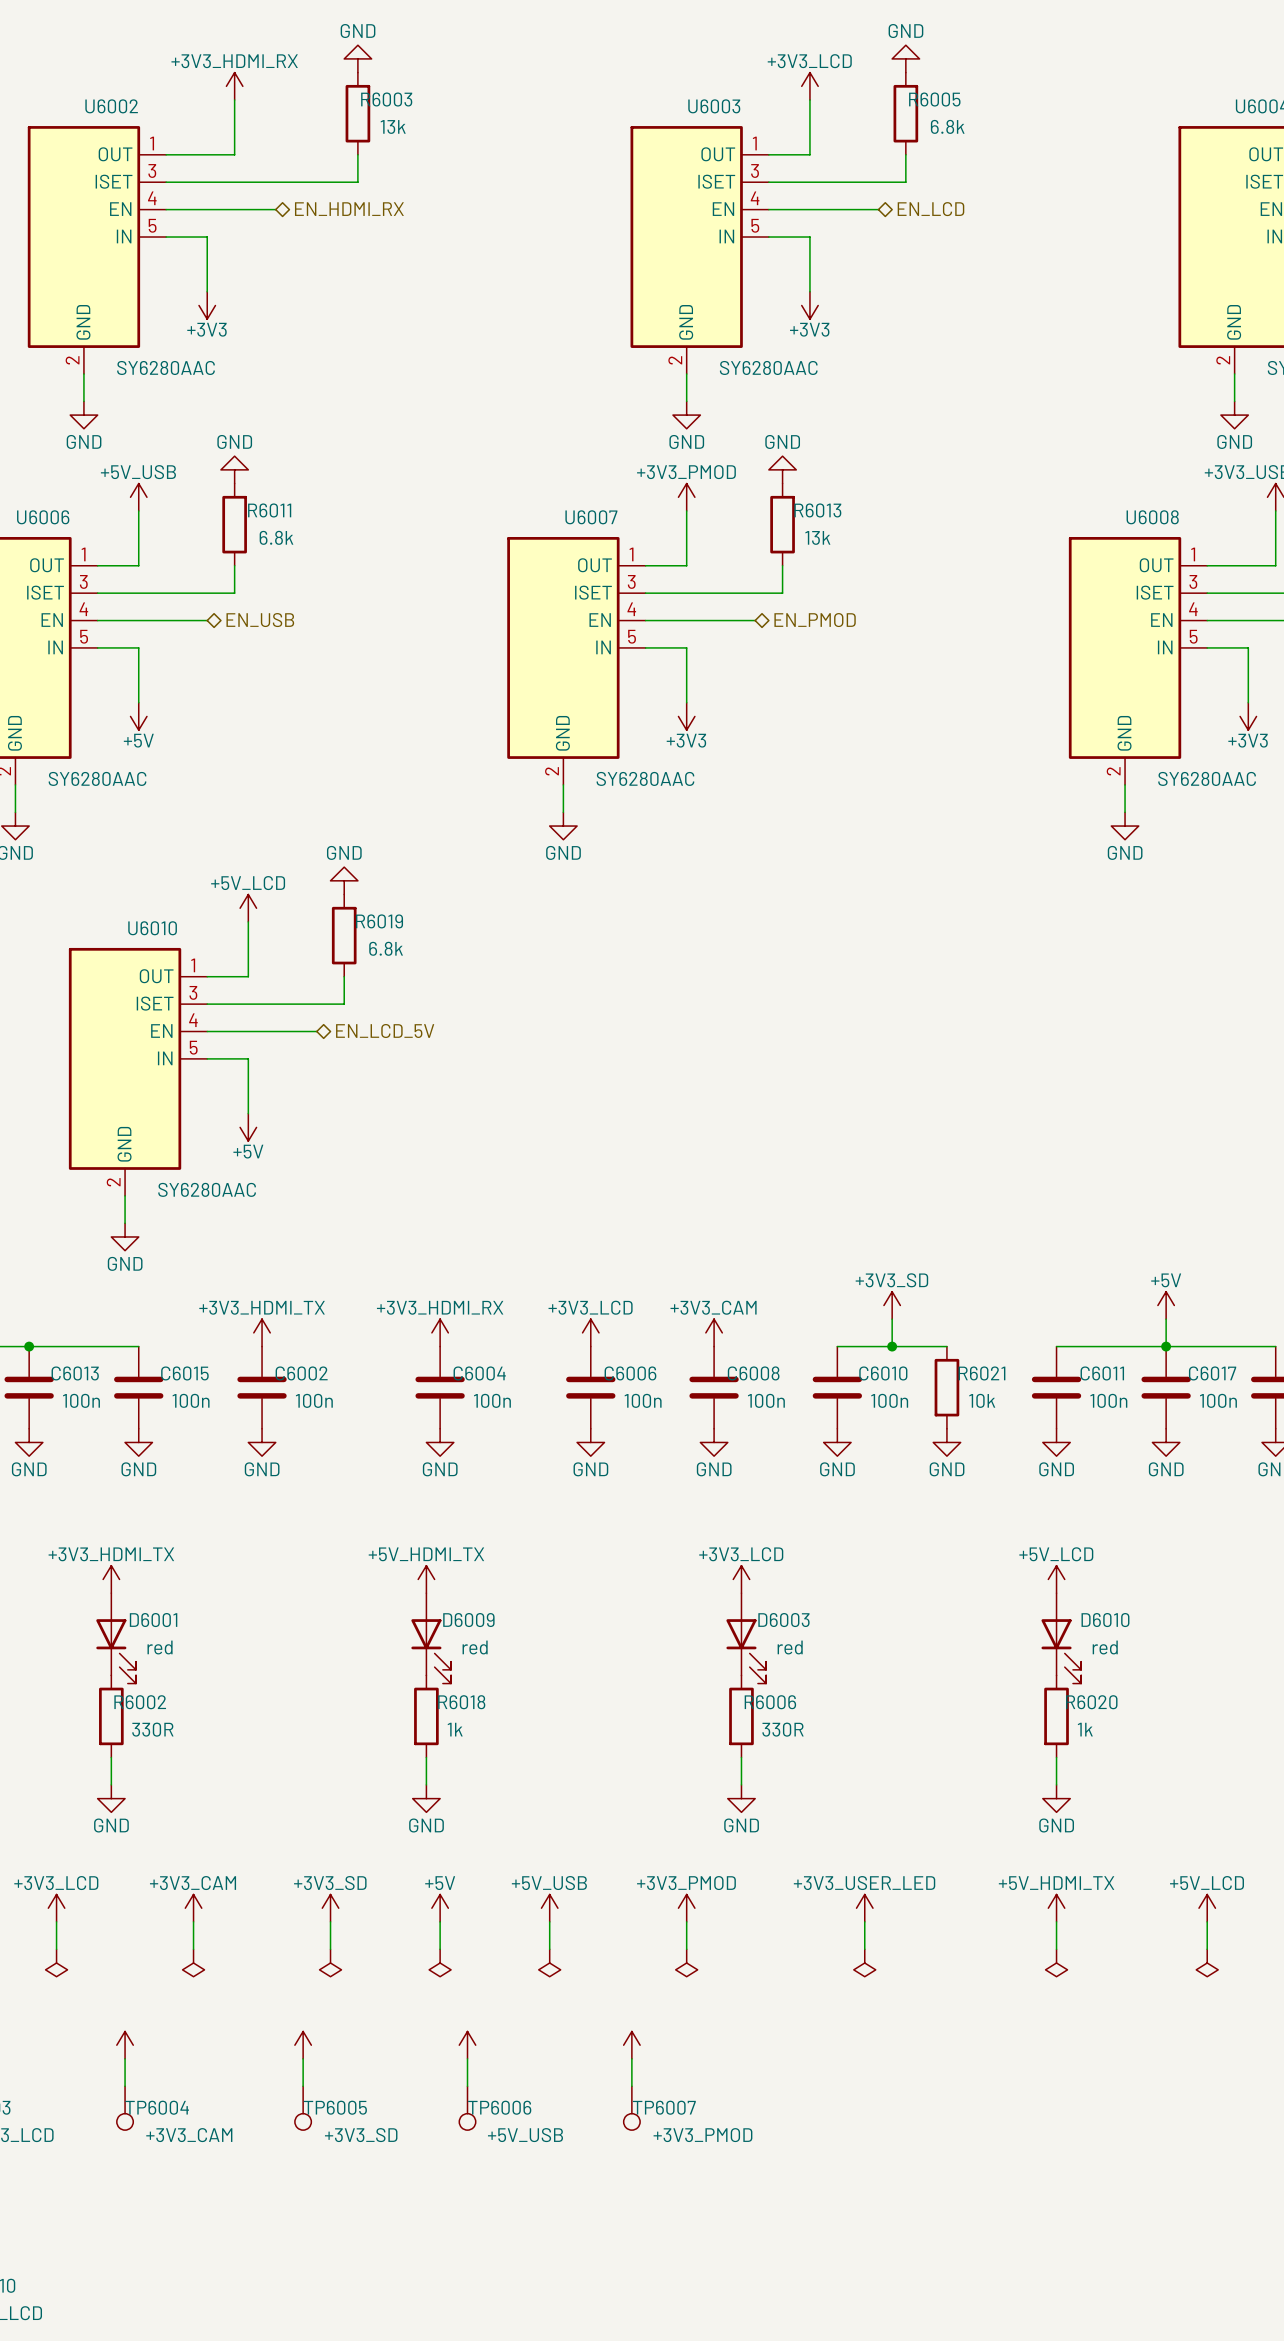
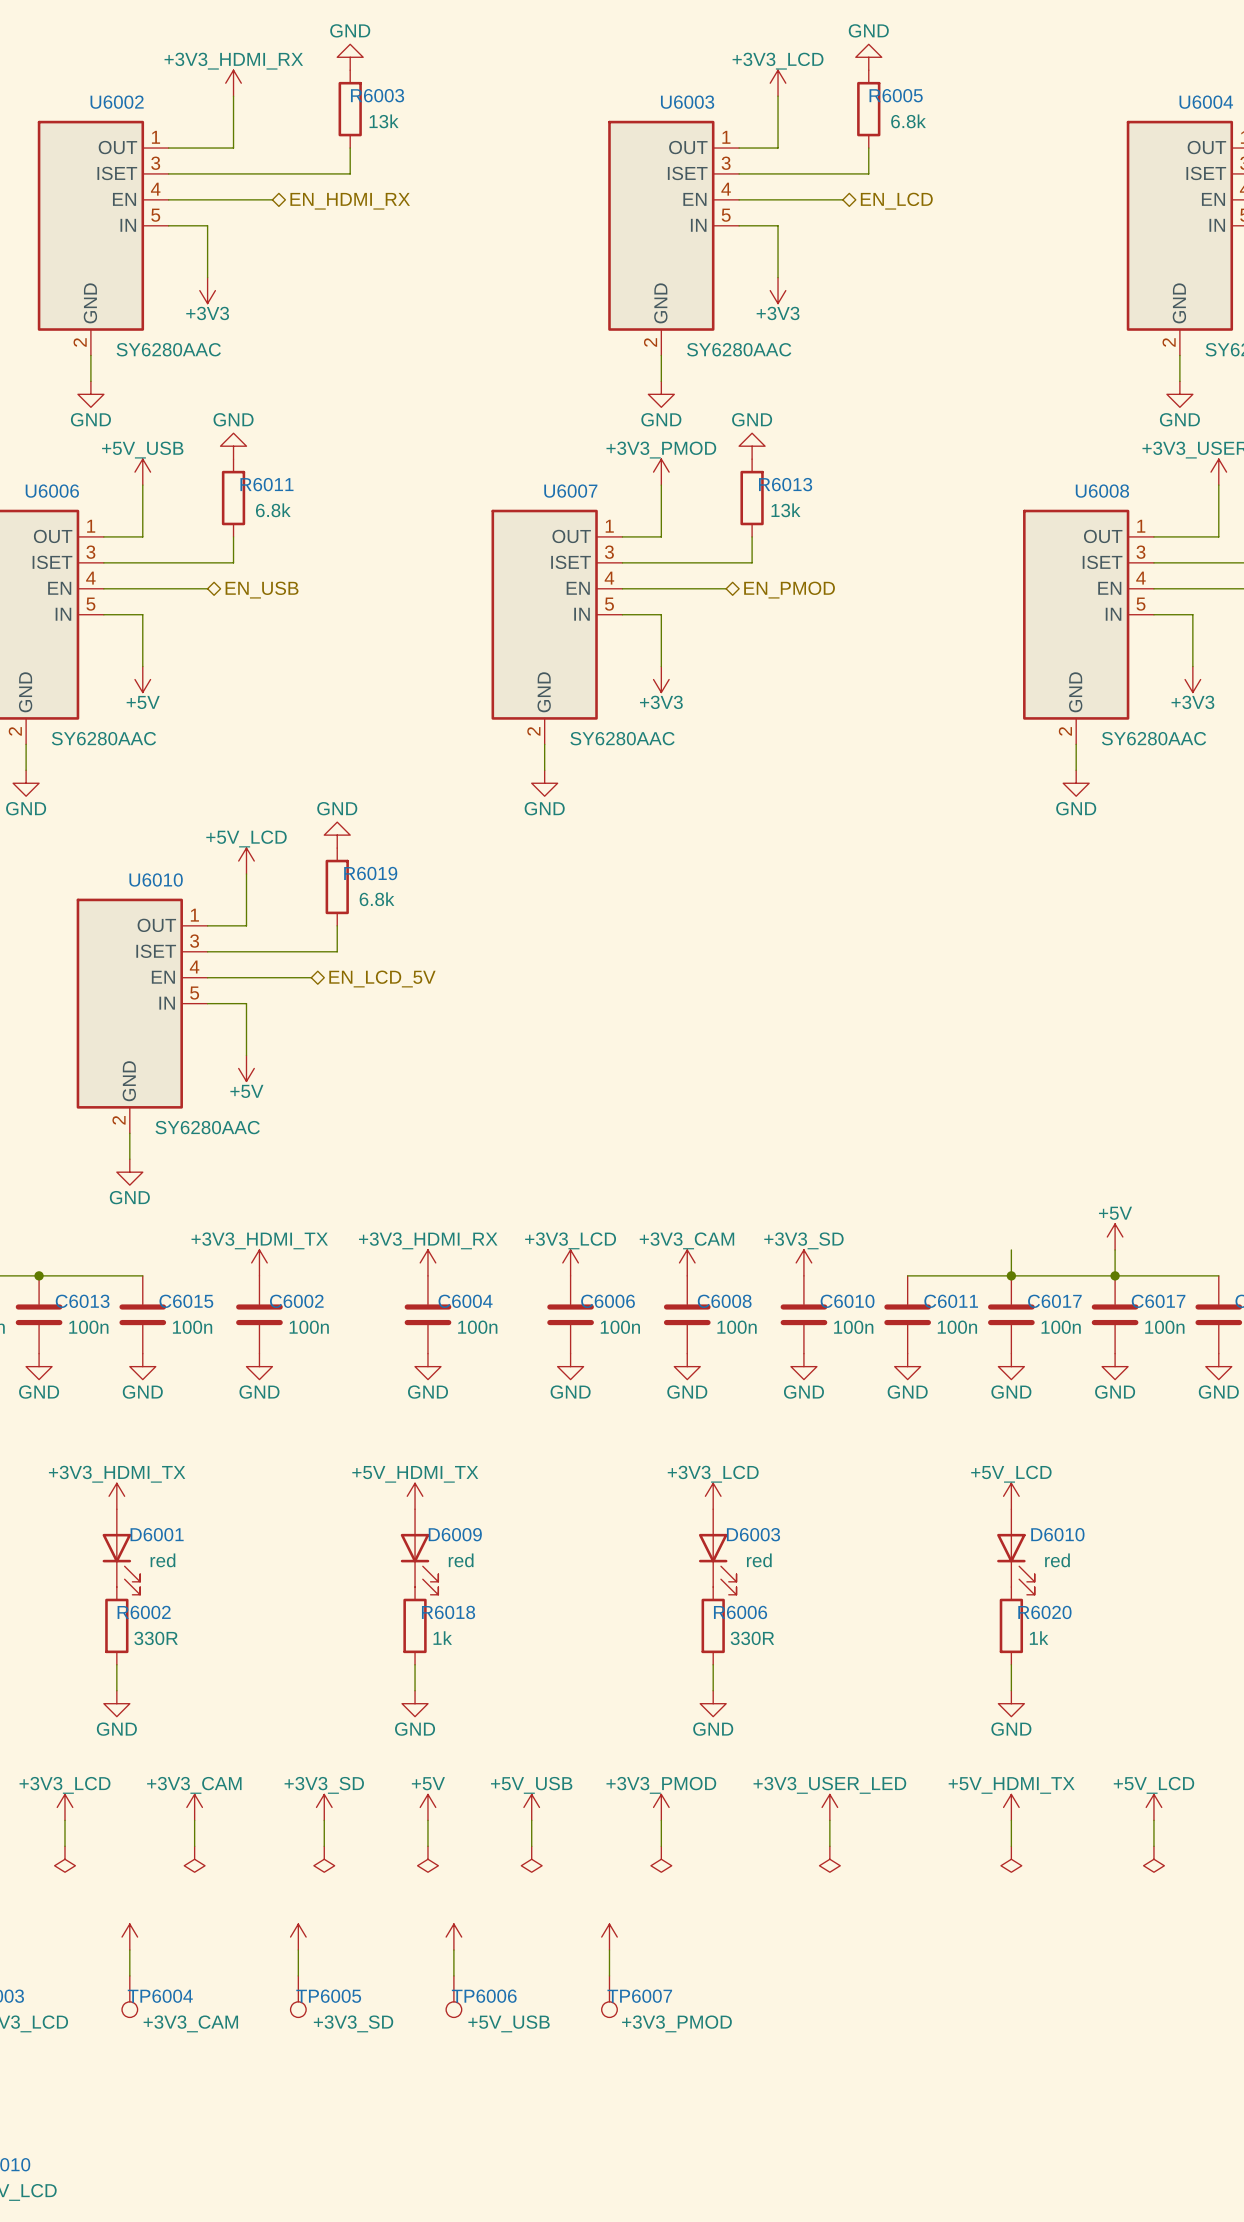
power symbol position: +3V3_SD (892, 1305) -> +3V3_SD (803, 1262)
wire: (892, 1319) (892, 1346) -> none
wire: (837, 1346) (946, 1346) -> (1011, 1249) (1011, 1275) (907, 1275)
junction: (892, 1346) -> none
junction: none -> (1011, 1275)
C6011 name: C6011 (1102, 1373) -> C6017 (1054, 1301)
R6021: 10k (946, 1387) -> none
C6011: none -> 100n (907, 1314)

